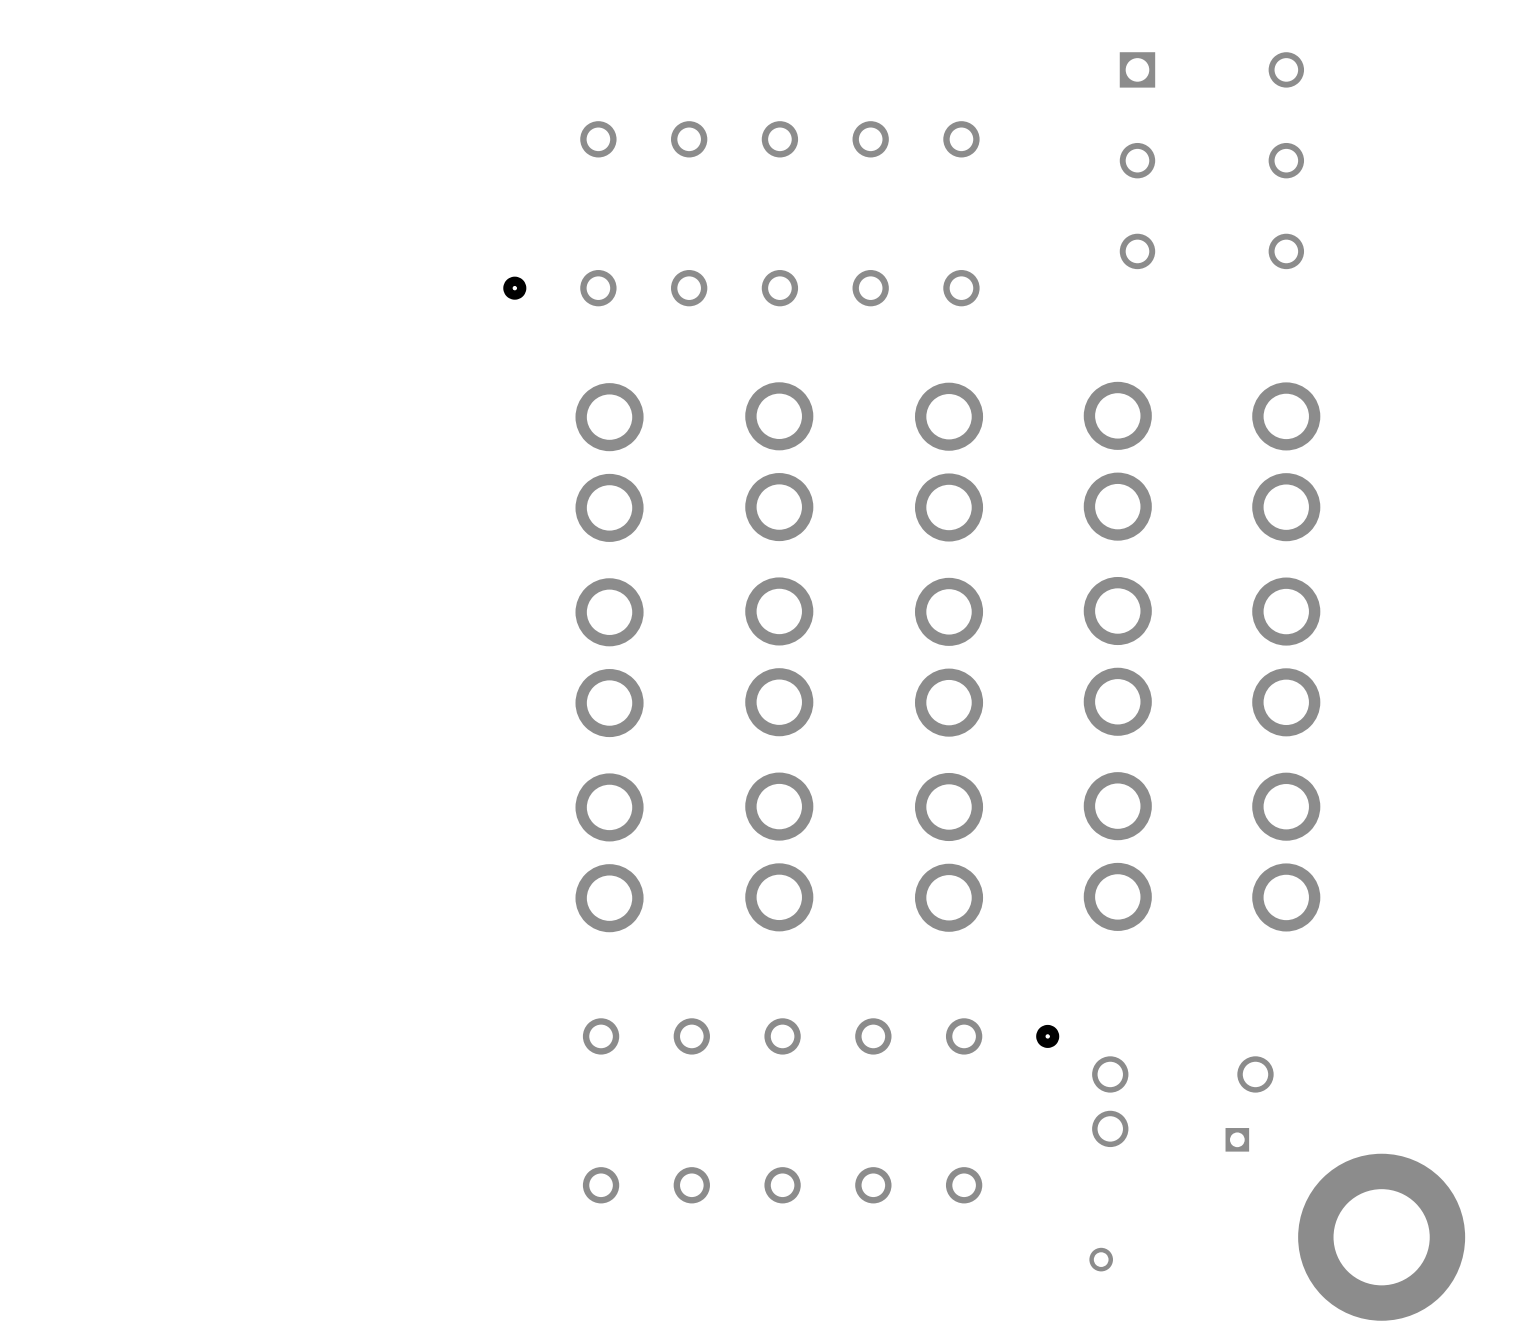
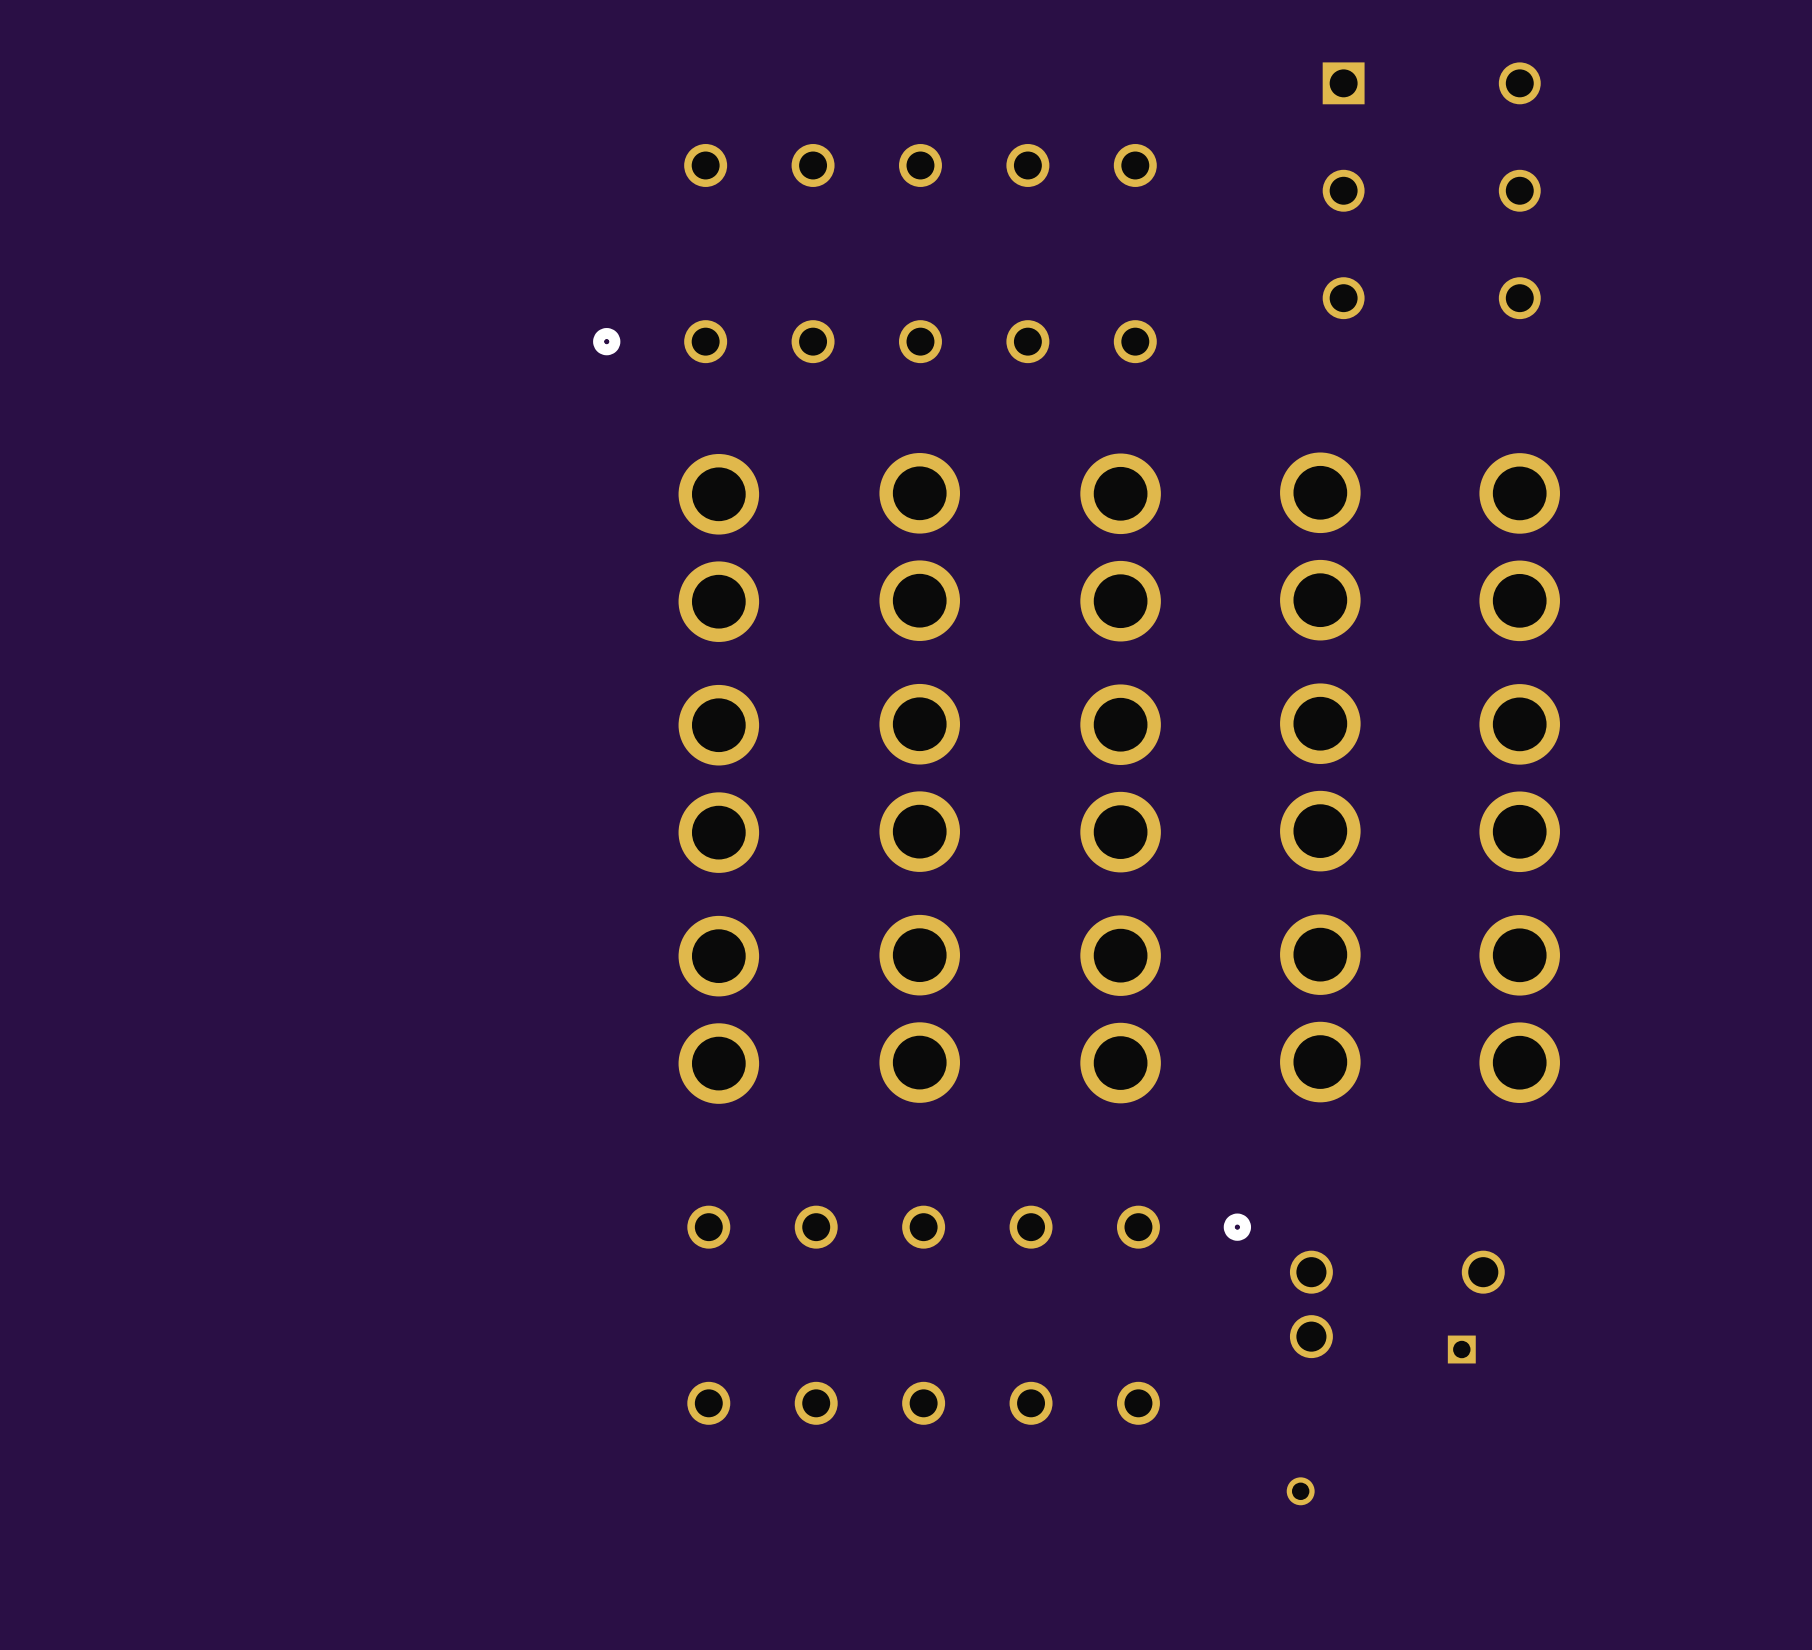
part: (1381, 1237) -> none

